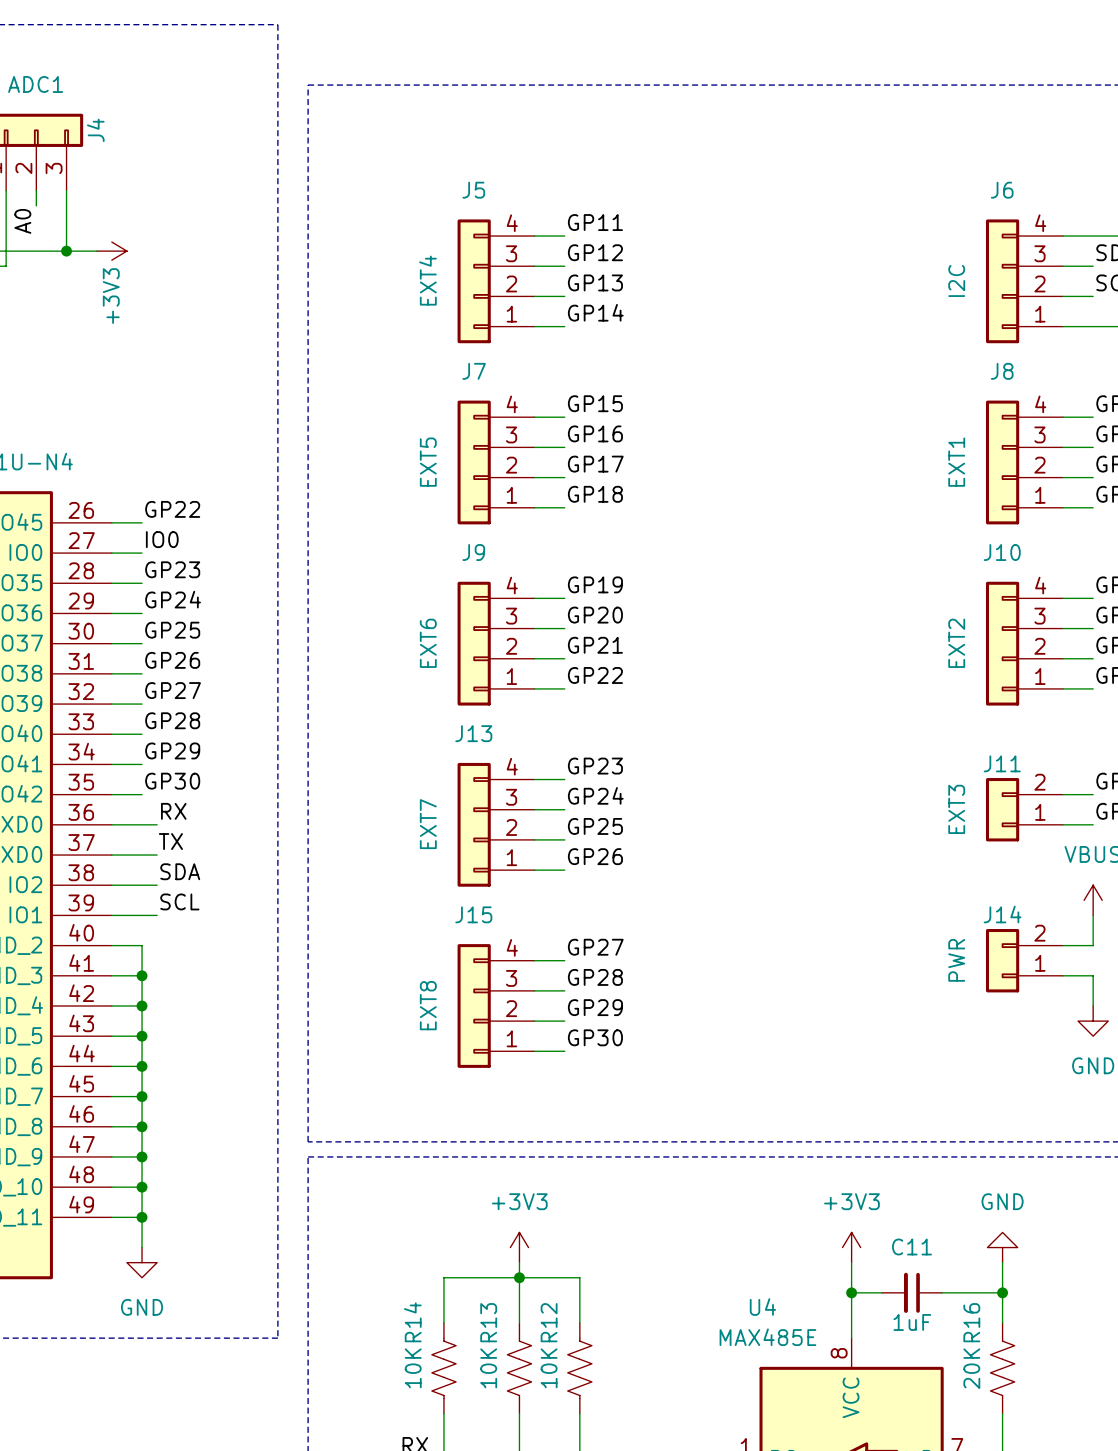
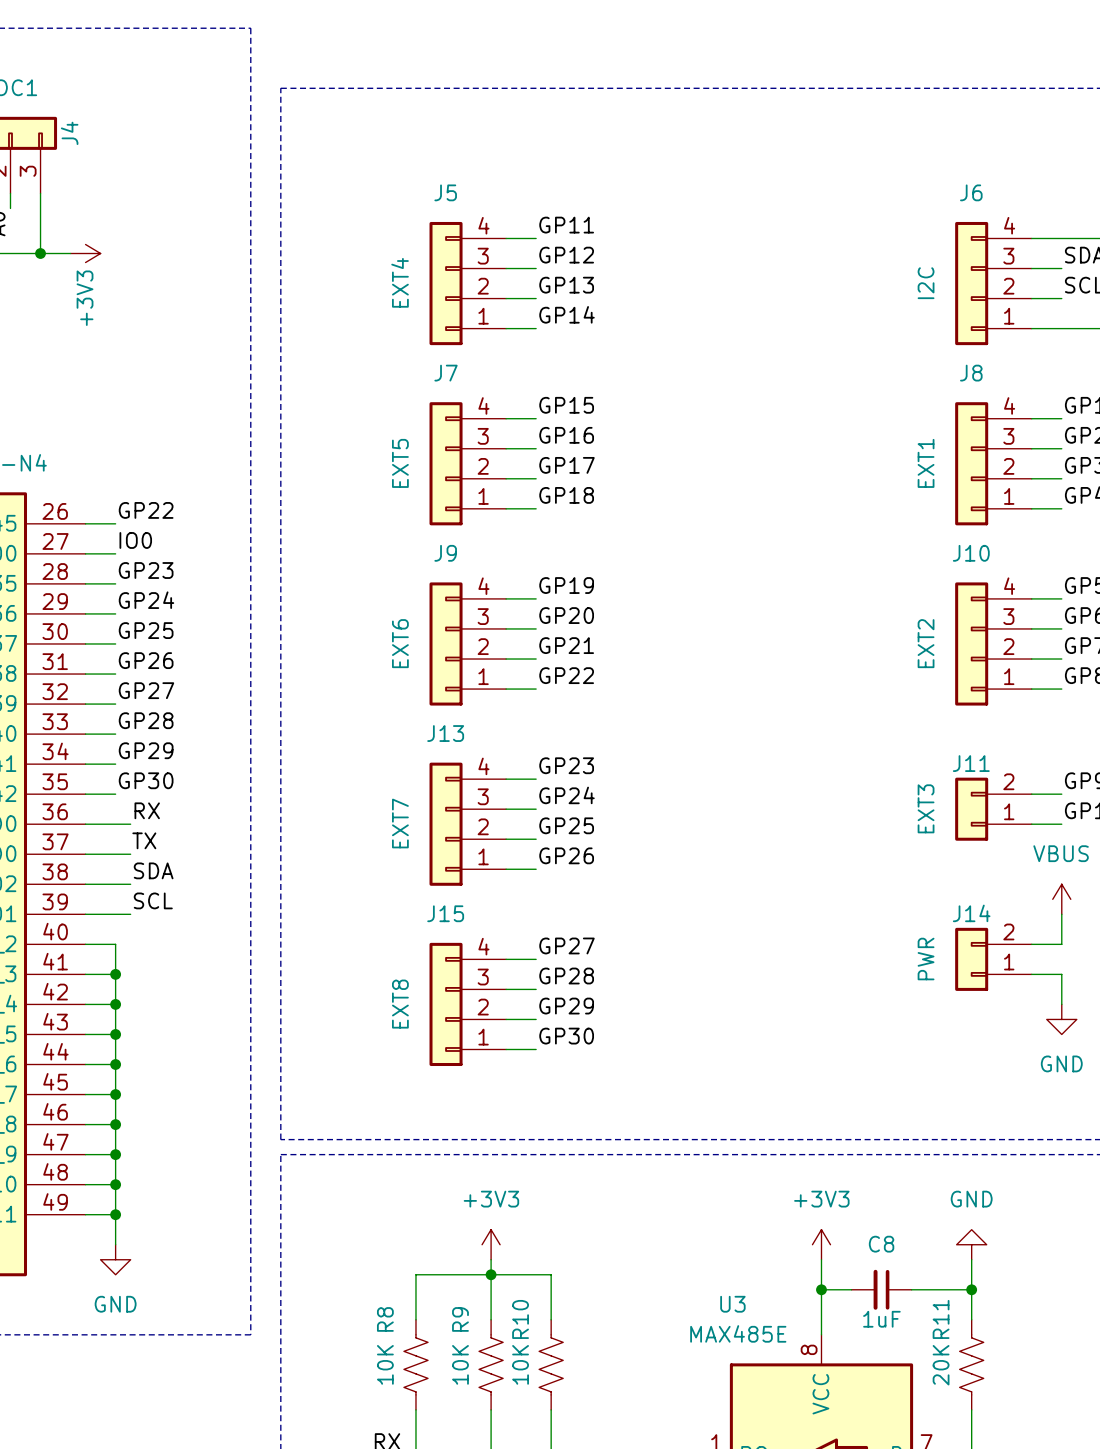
C11 name: C11 (911, 1246) -> C8 (881, 1244)
U4 name: U4 (762, 1307) -> U3 (732, 1304)
R14 name: R14 (412, 1322) -> R8 (385, 1319)
R13 name: R13 (488, 1322) -> R9 (460, 1319)
R12 name: R12 (549, 1322) -> R10 (520, 1319)
R16 name: R16 (971, 1322) -> R11 (941, 1319)

